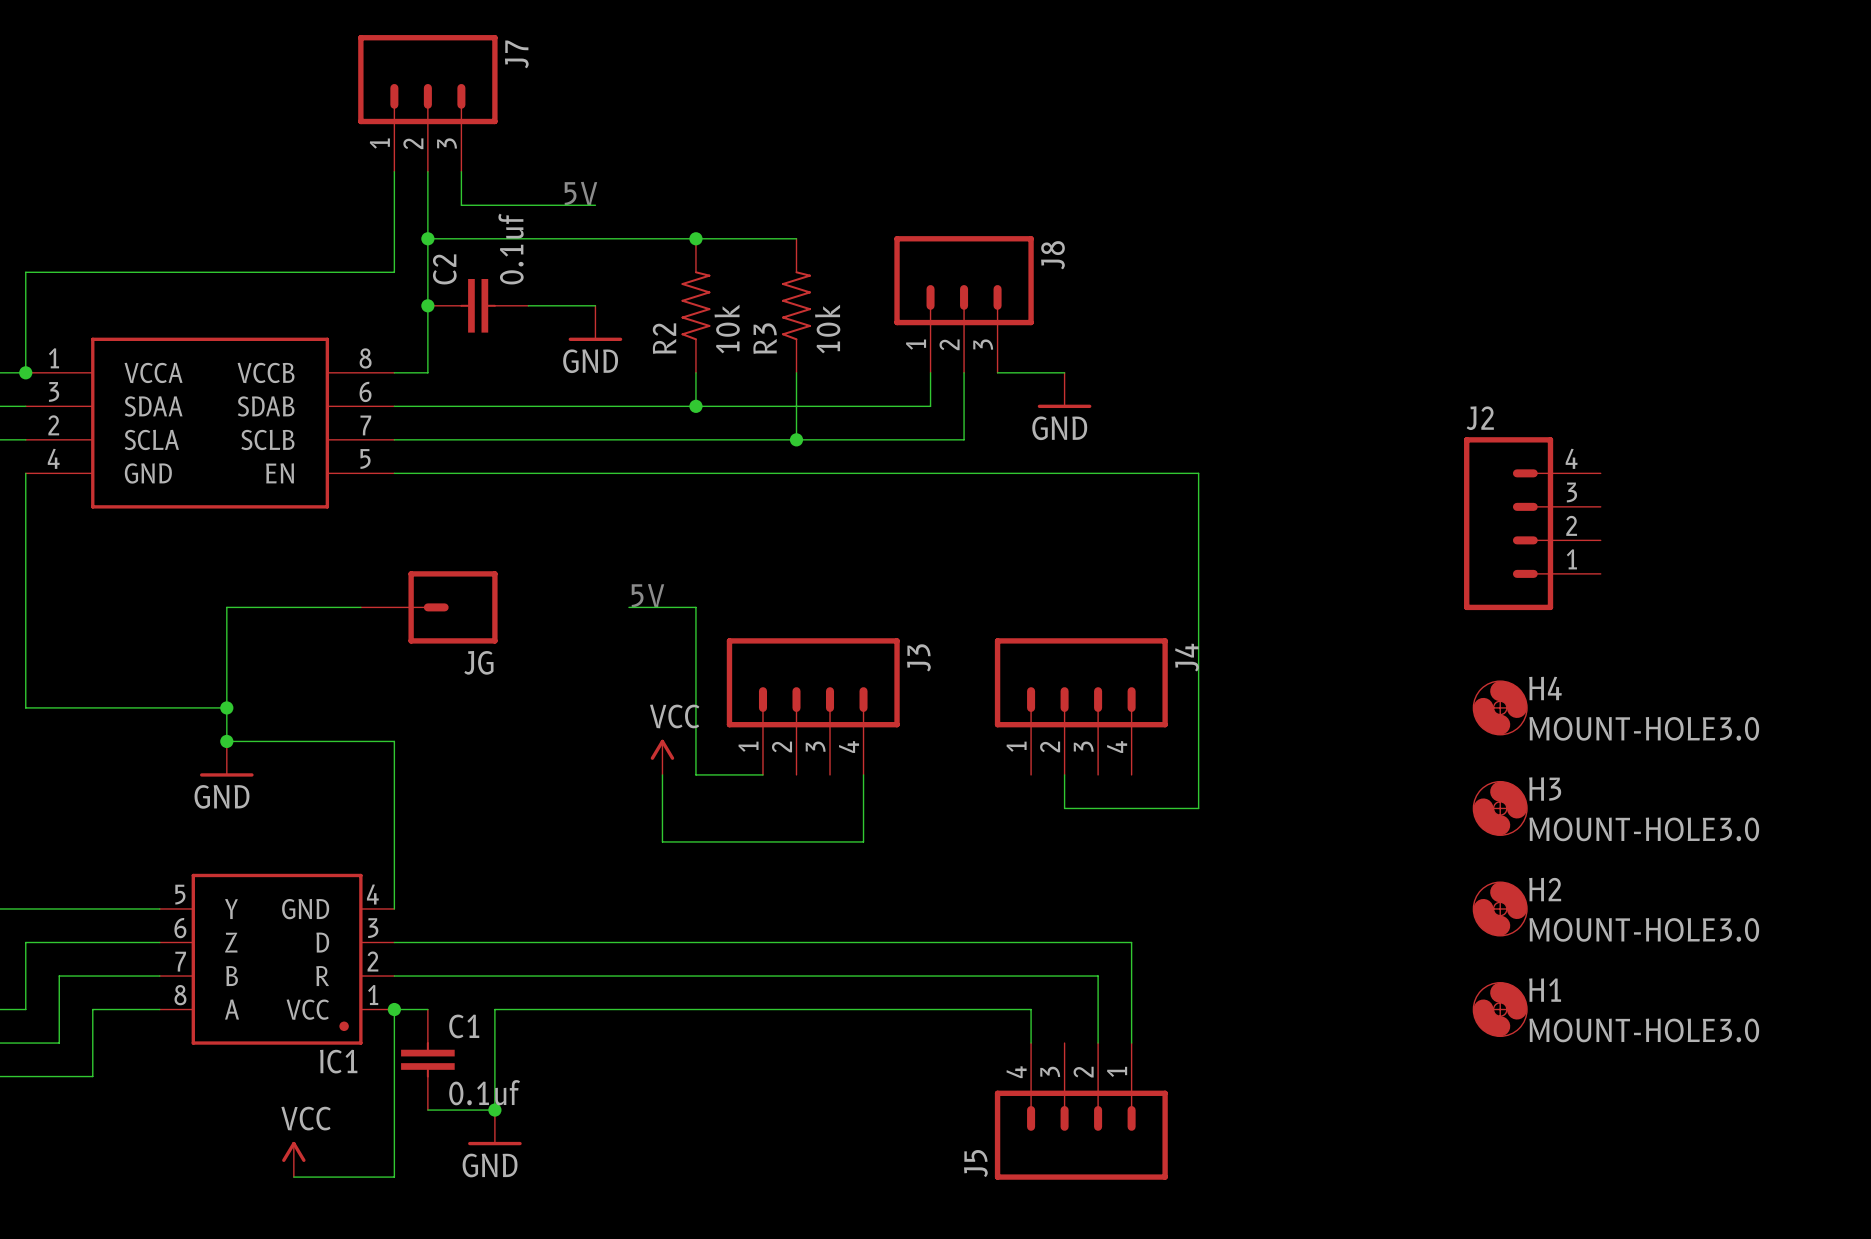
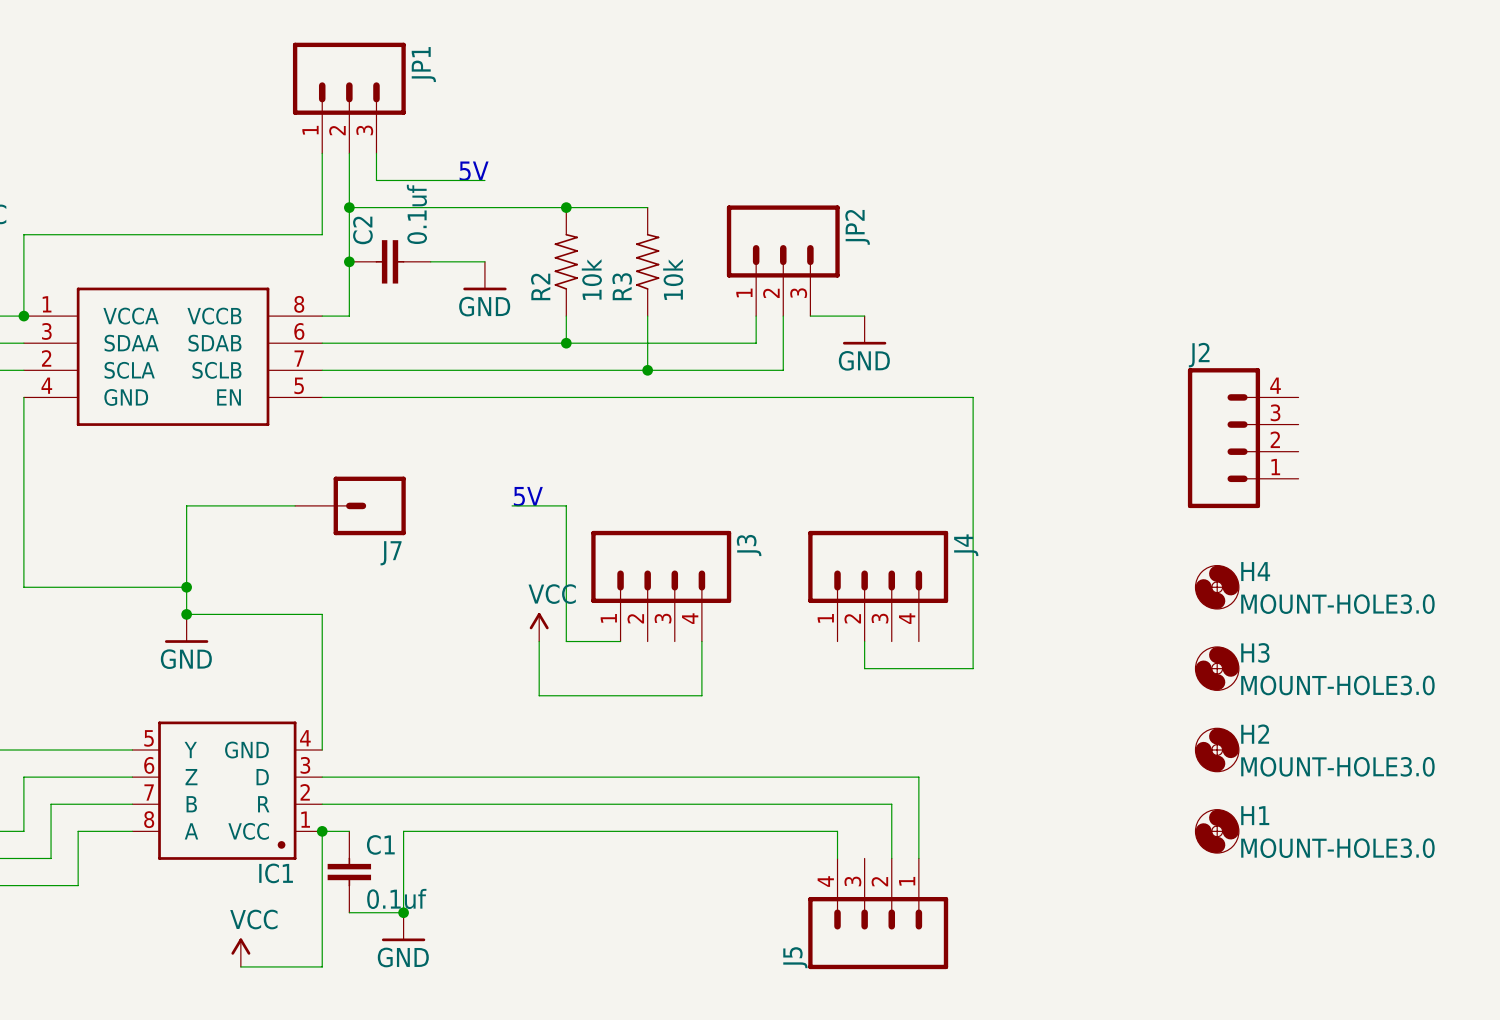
J7 name: J7 (516, 54) -> JP1 (423, 64)
J8 name: J8 (1052, 255) -> JP2 (857, 227)
JG name: JG (478, 662) -> J7 (391, 553)

